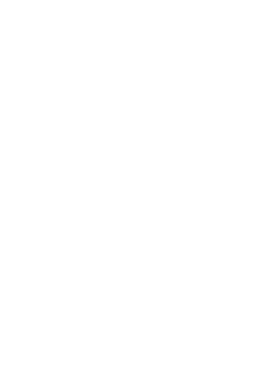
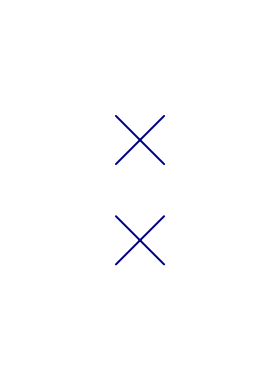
no-connect mark: none -> (140, 140)
no-connect mark: none -> (140, 240)

